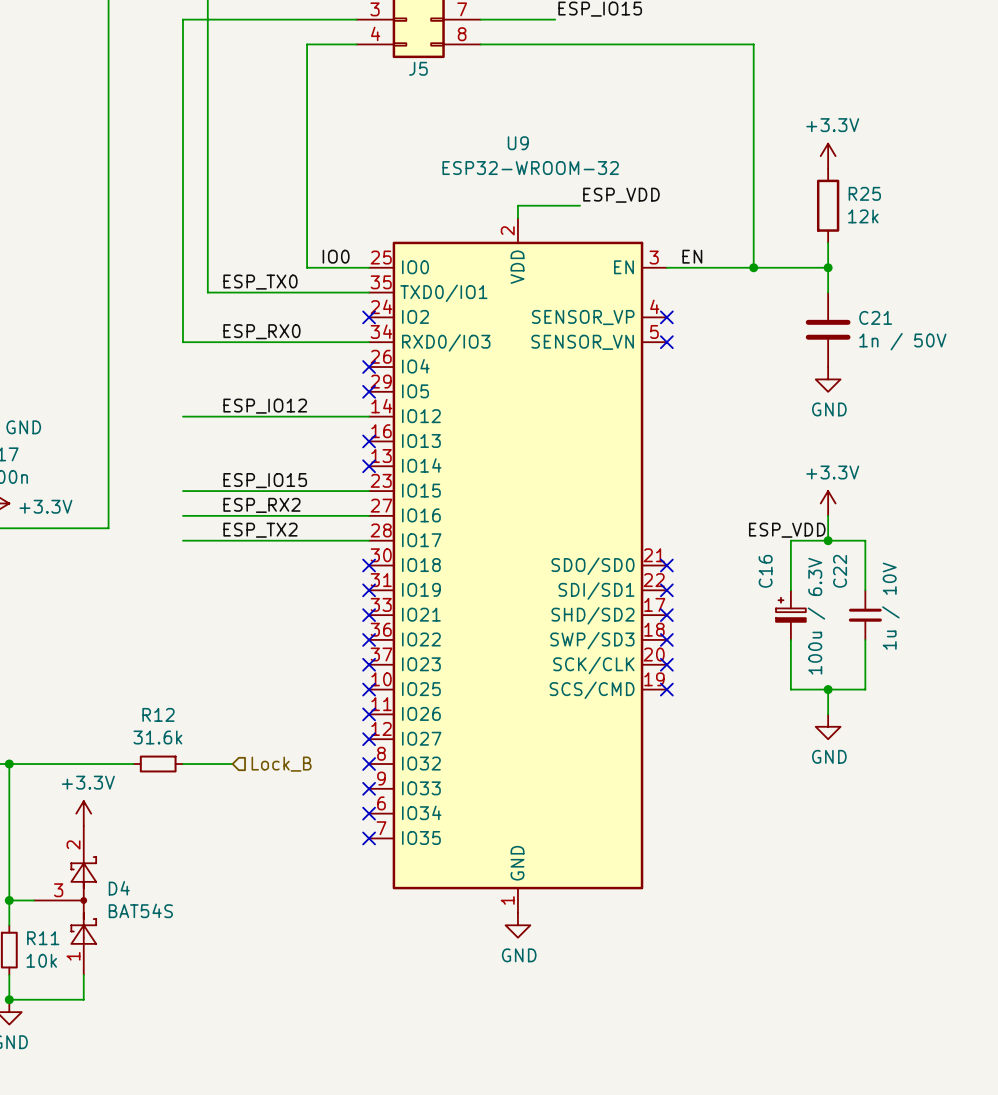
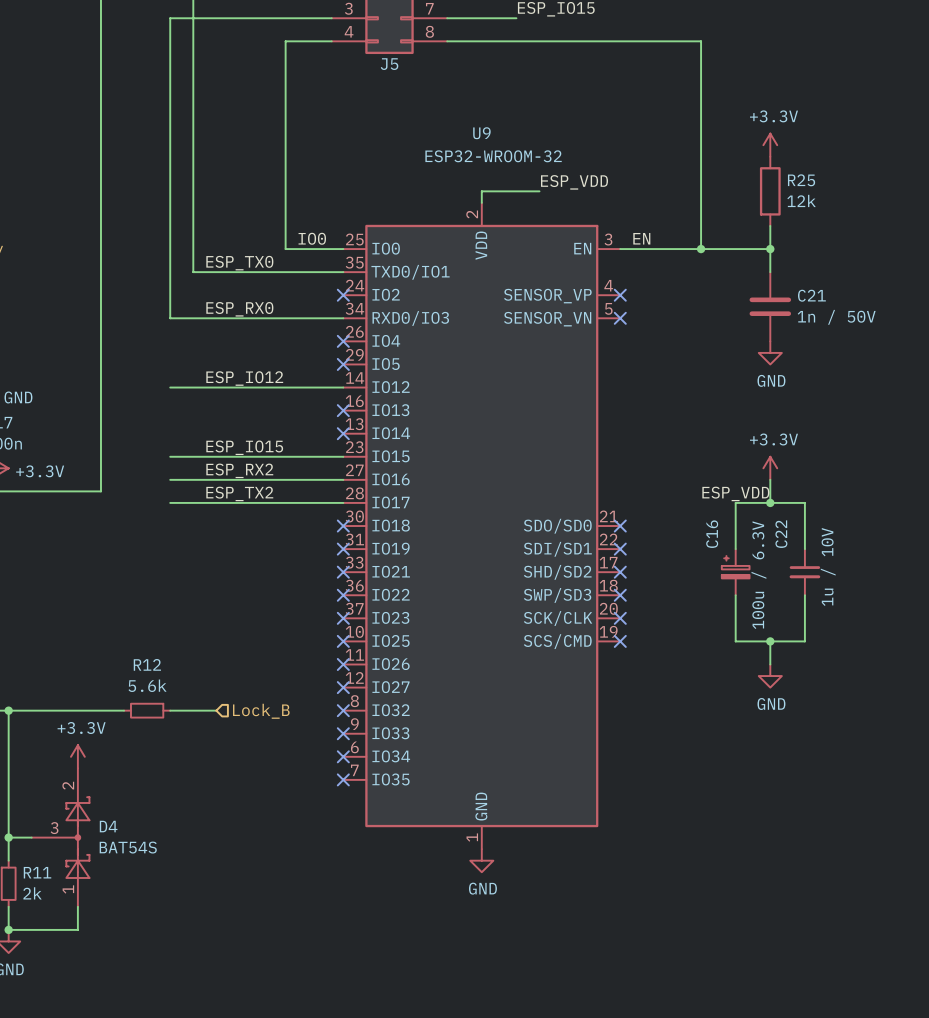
R12 value: 31.6k (157, 737) -> 5.6k (147, 685)
R11 value: 10k (41, 960) -> 2k (32, 893)

